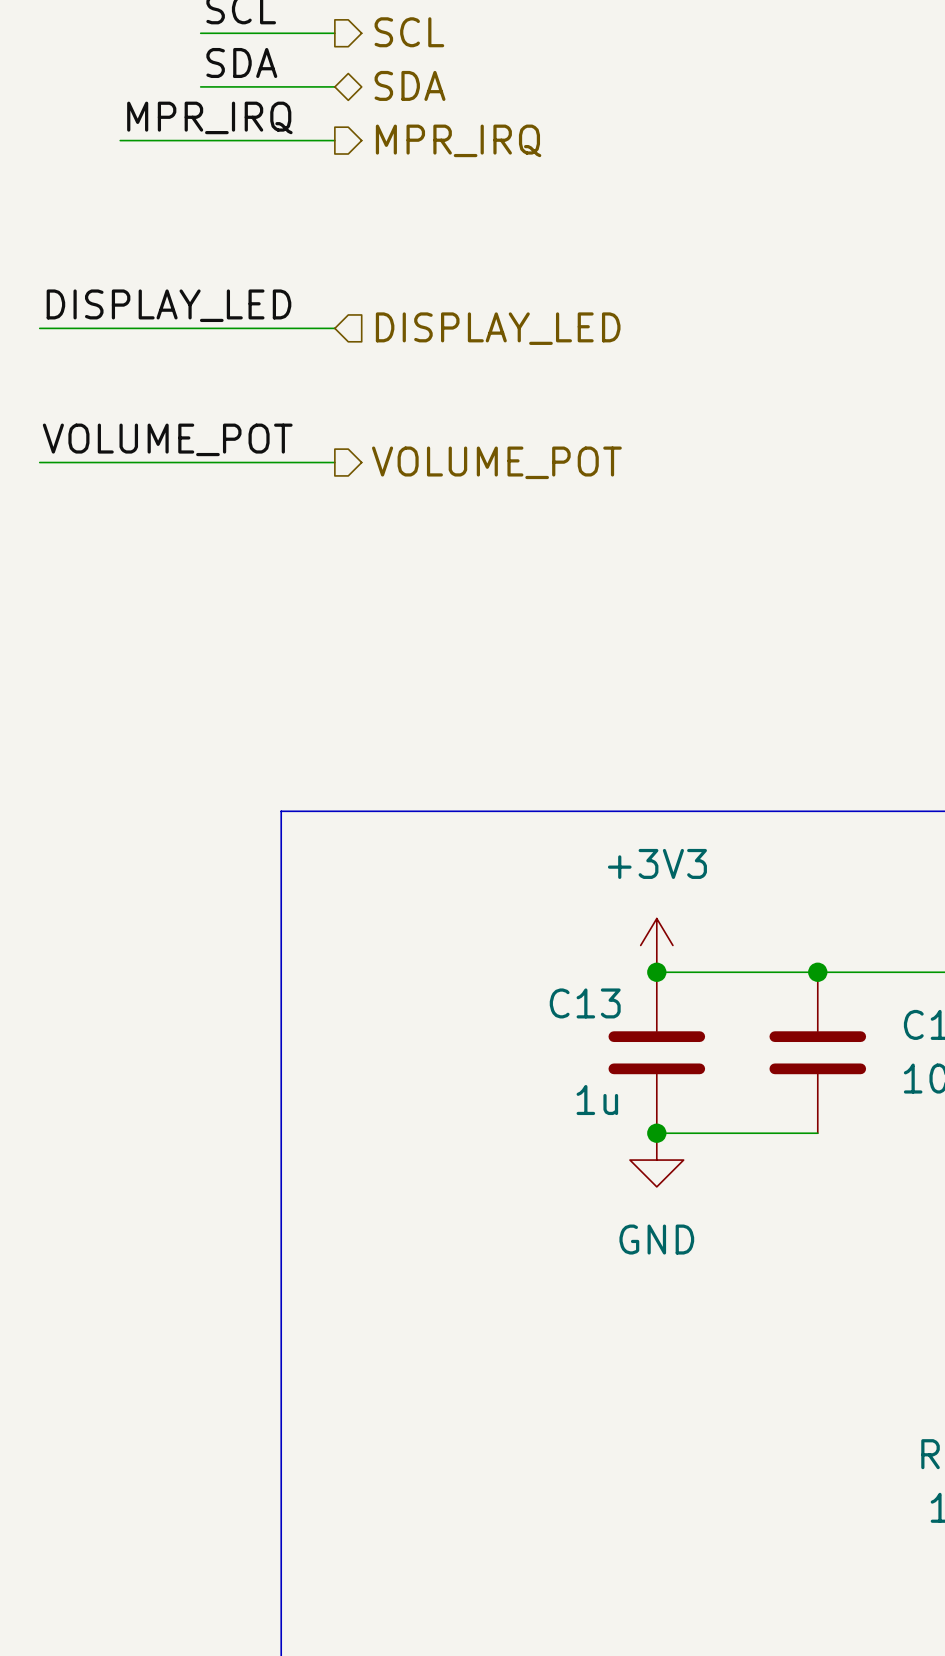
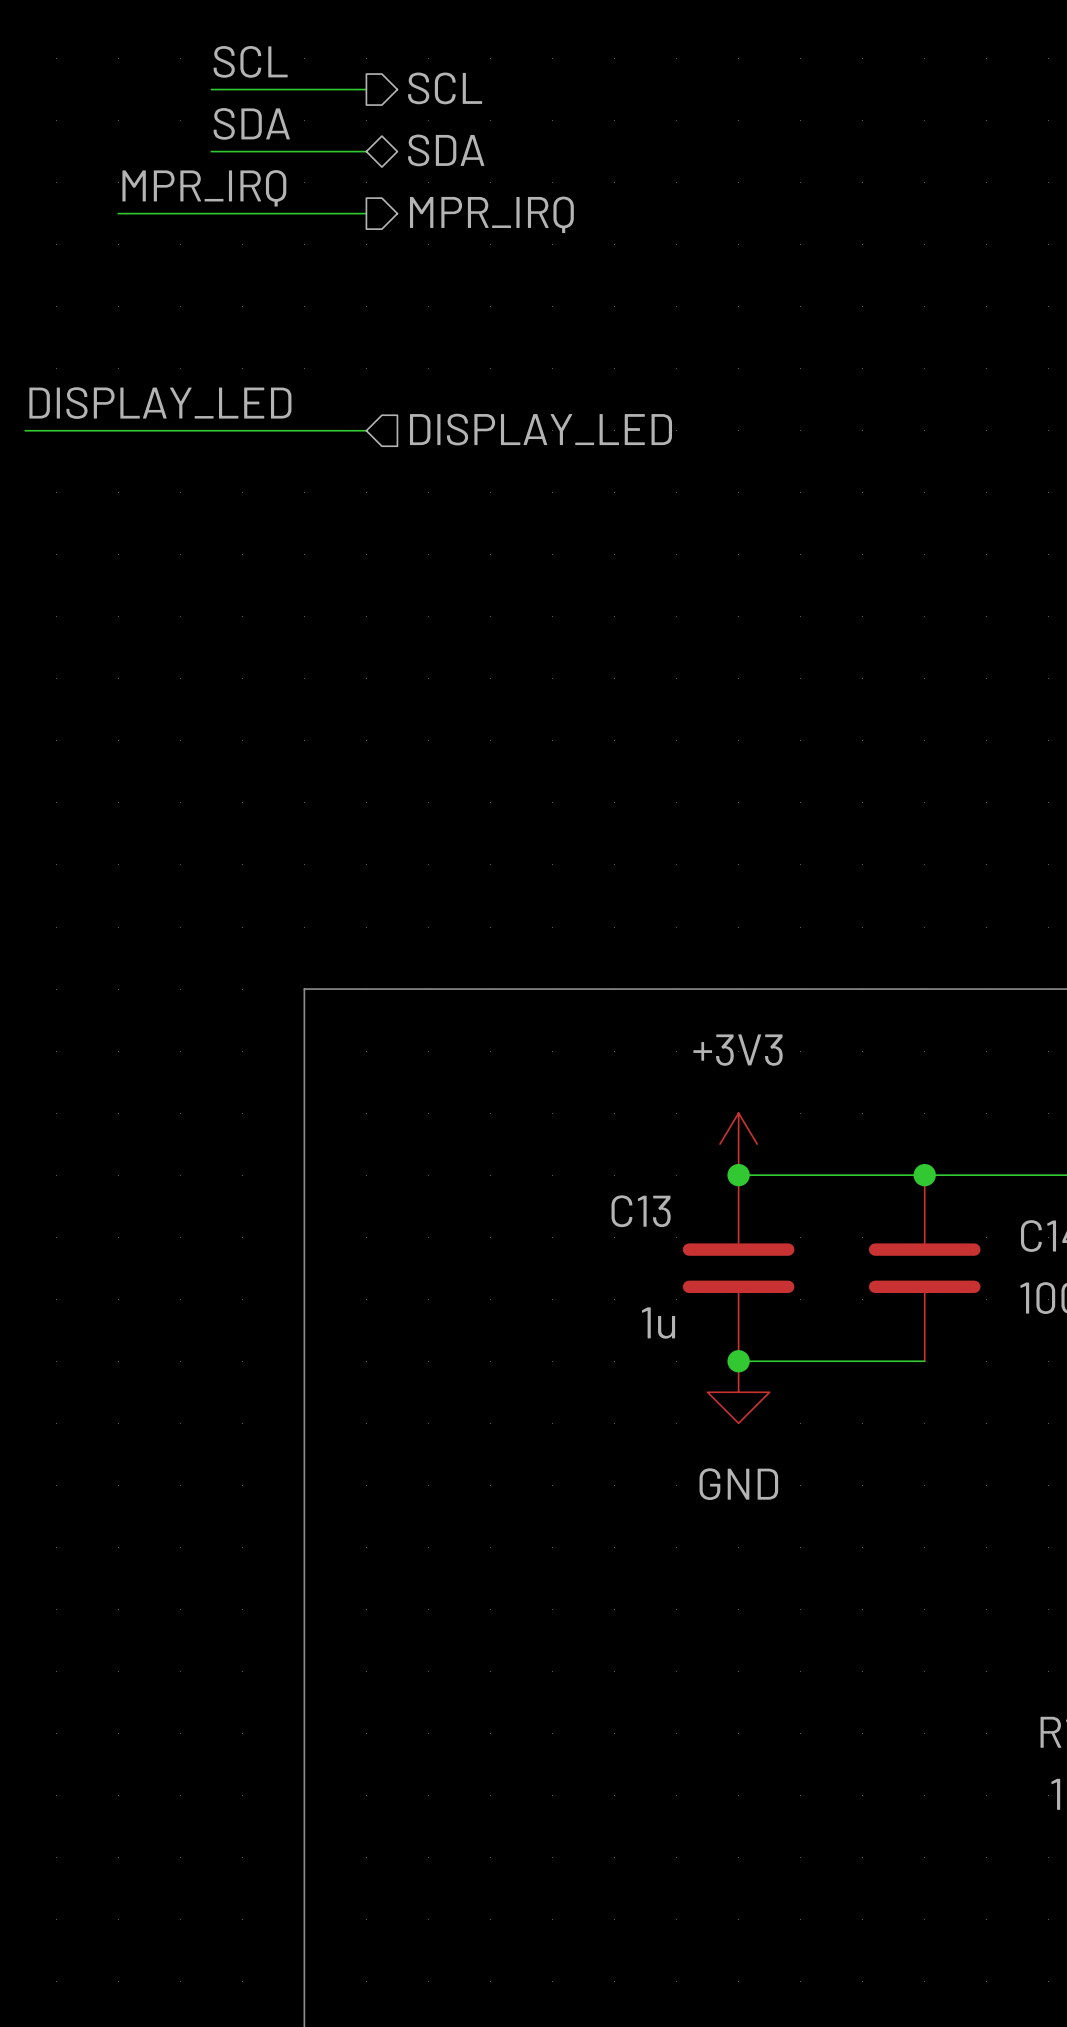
label: VOLUME_POT (167, 439) -> none
wire: (39, 462) (334, 462) -> none
hierarchical label: VOLUME_POT (496, 462) -> none

